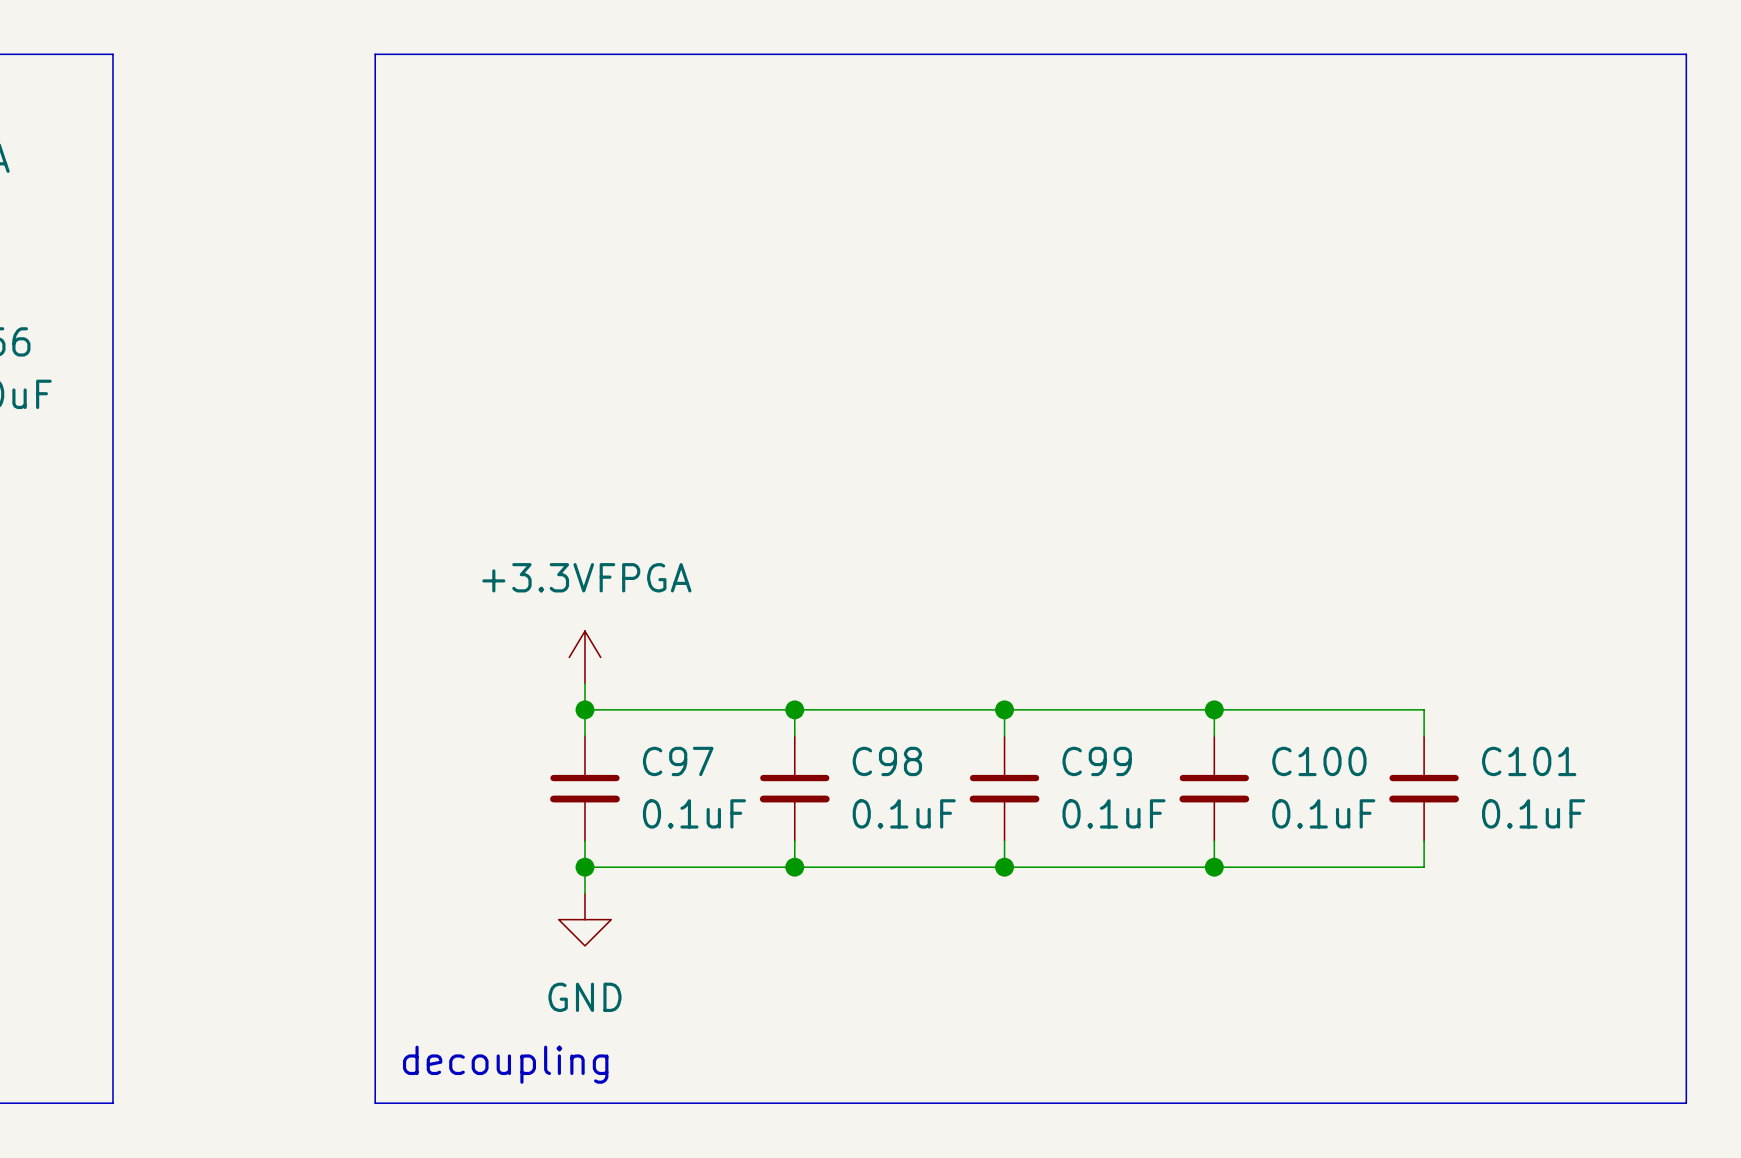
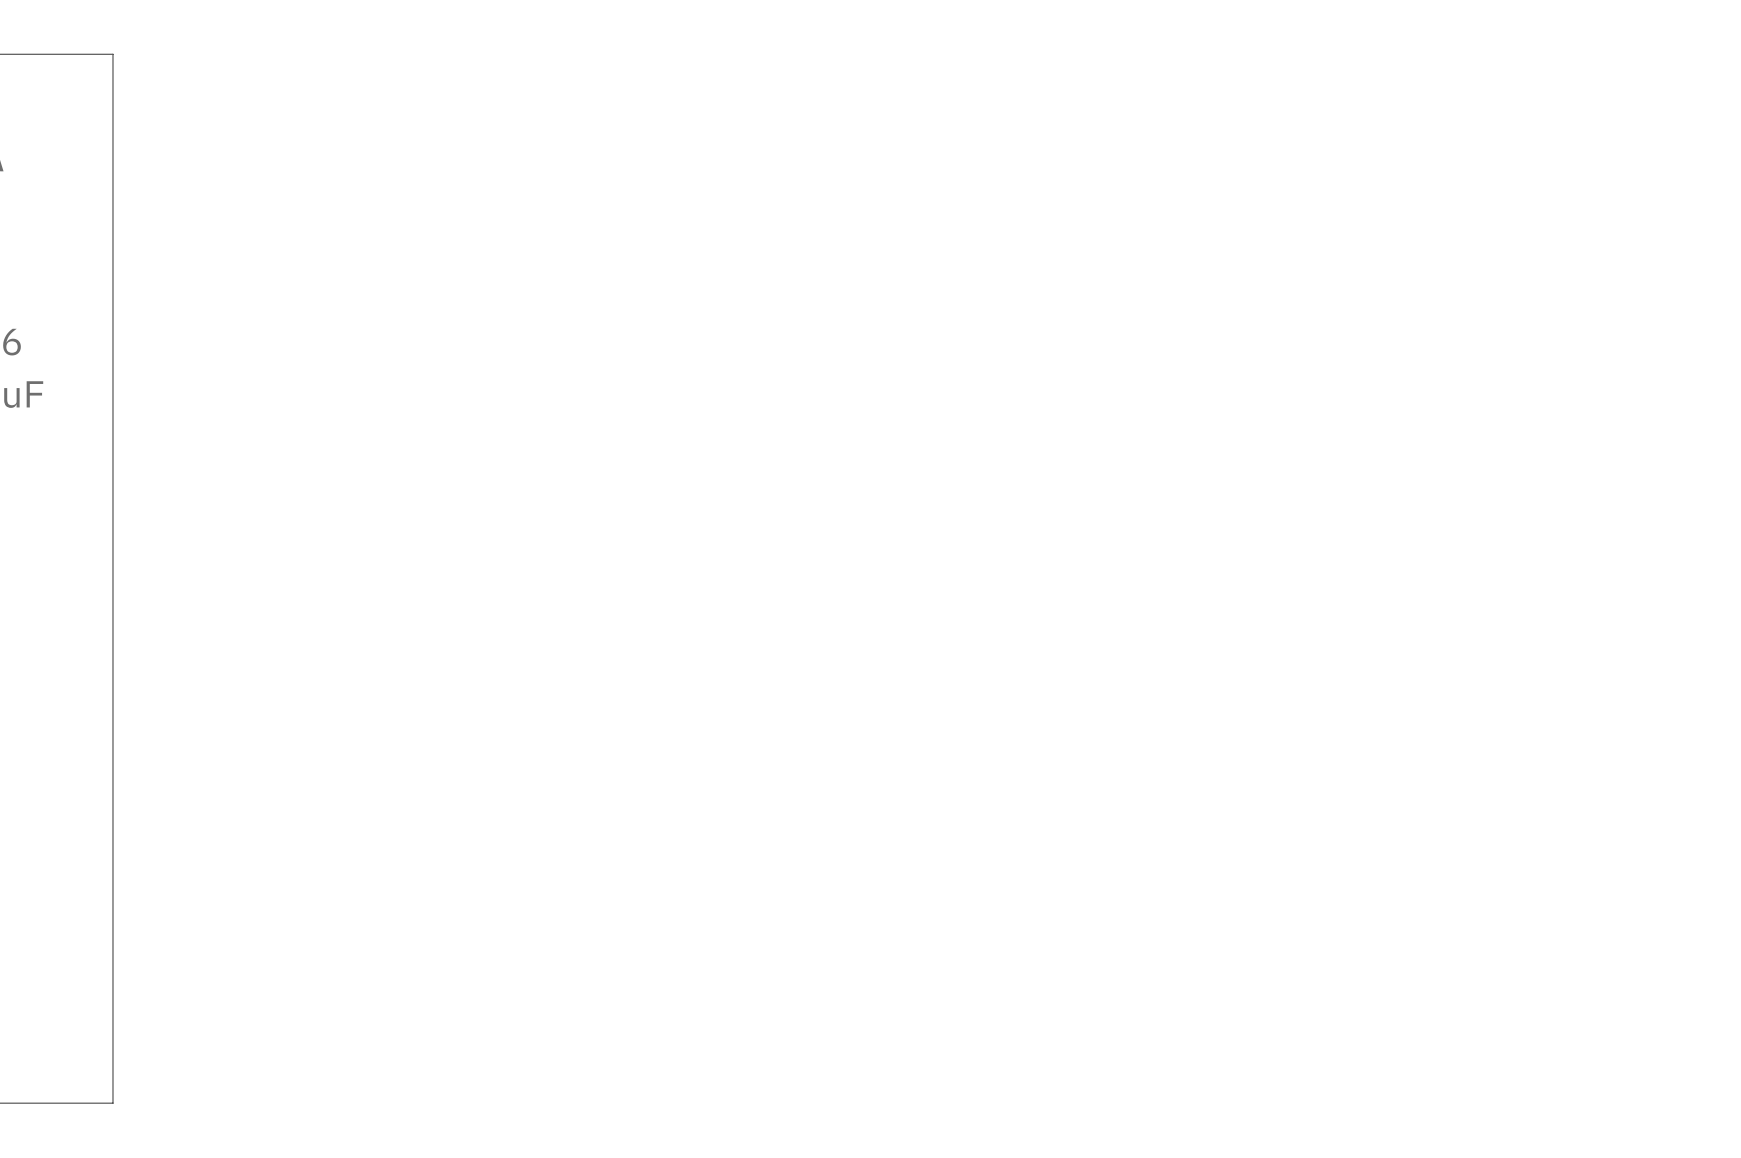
line: (375, 54) (1686, 54) (1686, 1103) (375, 1103) (375, 54) -> none
power symbol: +3.3VFPGA (584, 657) -> none
wire: (584, 683) (584, 736) -> none
wire: (584, 709) (1424, 709) (1424, 736) -> none
junction: (584, 709) -> none
wire: (794, 709) (794, 736) -> none
junction: (794, 709) -> none
wire: (1004, 709) (1004, 736) -> none
junction: (1004, 709) -> none
wire: (1214, 709) (1214, 736) -> none
junction: (1214, 709) -> none
C97: 0.1uF (584, 788) -> none
C98: 0.1uF (794, 788) -> none
C99: 0.1uF (1004, 788) -> none
C100: 0.1uF (1214, 788) -> none
C101: 0.1uF (1424, 788) -> none
wire: (584, 840) (584, 893) -> none
wire: (794, 840) (794, 867) -> none
wire: (1004, 840) (1004, 867) -> none
wire: (1214, 840) (1214, 867) -> none
wire: (1424, 840) (1424, 867) (584, 867) -> none
junction: (584, 867) -> none
junction: (794, 867) -> none
junction: (1004, 867) -> none
junction: (1214, 867) -> none
power symbol: GND (584, 919) -> none
text: decoupling (505, 1064) -> none

